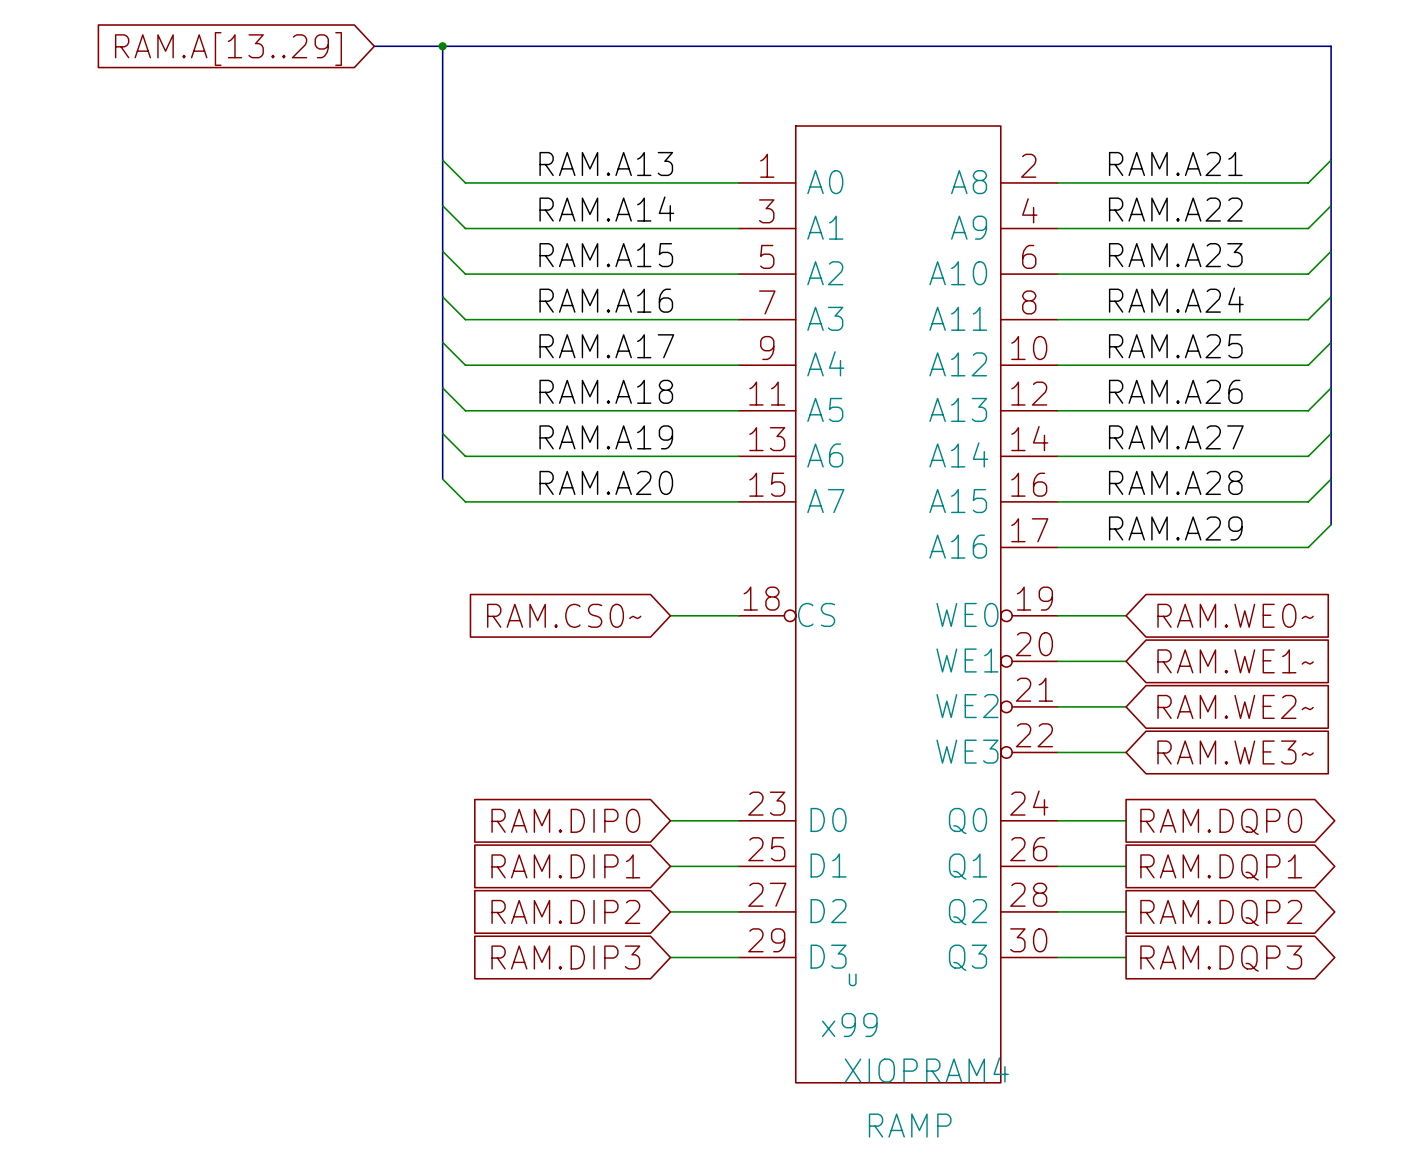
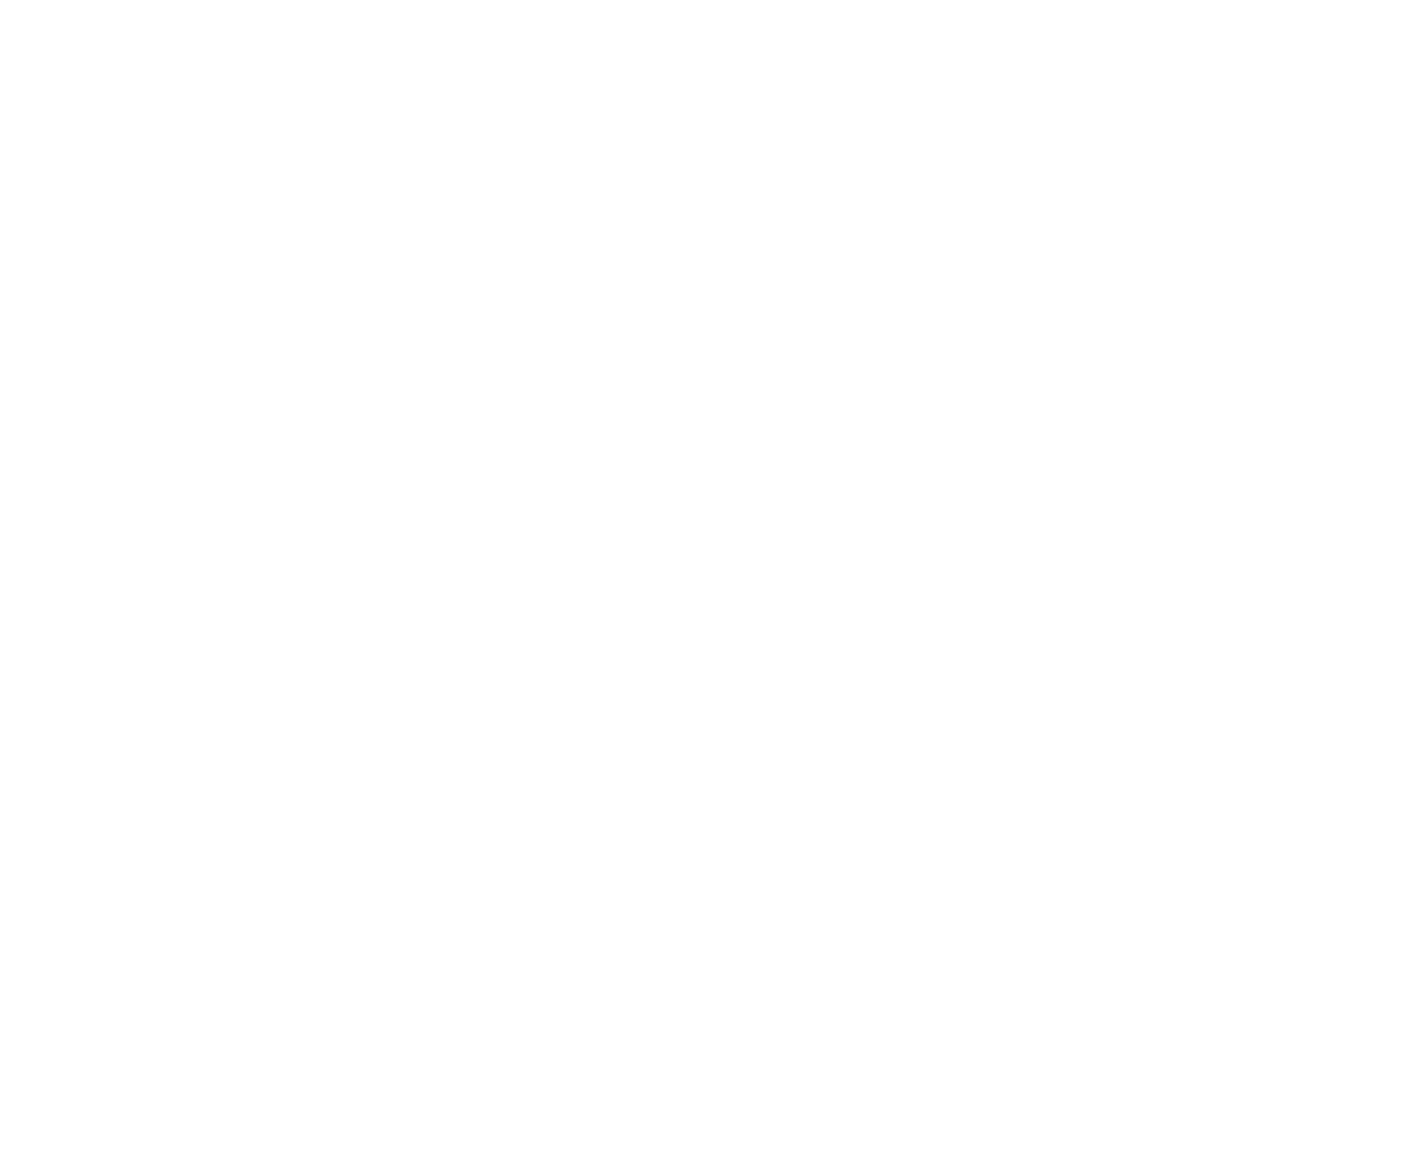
bus: (374, 46) (1331, 46) (1331, 524) -> none
bus: (442, 46) (442, 479) -> none
junction: (442, 46) -> none
global label: RAM.A[13..29] (228, 48) -> none
wire: (442, 160) (465, 182) (738, 182) -> none
wire: (1331, 160) (1308, 182) (1057, 182) -> none
label: RAM.A13 (606, 164) -> none
label: RAM.A21 (1175, 164) -> none
wire: (442, 205) (465, 228) (738, 228) -> none
wire: (1331, 205) (1308, 228) (1057, 228) -> none
label: RAM.A14 (606, 209) -> none
label: RAM.A22 (1175, 209) -> none
wire: (442, 251) (465, 274) (738, 274) -> none
wire: (1331, 251) (1308, 274) (1057, 274) -> none
label: RAM.A15 (606, 255) -> none
label: RAM.A23 (1175, 255) -> none
wire: (442, 296) (465, 319) (738, 319) -> none
wire: (1331, 296) (1308, 319) (1057, 319) -> none
label: RAM.A16 (606, 300) -> none
label: RAM.A24 (1176, 300) -> none
wire: (442, 342) (465, 365) (738, 365) -> none
wire: (1331, 342) (1308, 365) (1057, 365) -> none
label: RAM.A17 (606, 346) -> none
label: RAM.A25 (1175, 346) -> none
wire: (442, 387) (465, 410) (738, 410) -> none
wire: (1331, 387) (1308, 410) (1057, 410) -> none
label: RAM.A18 (606, 391) -> none
label: RAM.A26 (1175, 391) -> none
wire: (442, 433) (465, 456) (738, 456) -> none
wire: (1331, 433) (1308, 456) (1057, 456) -> none
label: RAM.A19 (606, 437) -> none
label: RAM.A27 (1176, 437) -> none
wire: (442, 479) (465, 501) (738, 501) -> none
wire: (1331, 479) (1308, 501) (1057, 501) -> none
label: RAM.A20 (606, 482) -> none
label: RAM.A28 (1175, 482) -> none
wire: (1331, 524) (1308, 547) (1057, 547) -> none
label: RAM.A29 (1175, 528) -> none
U: XIOPRAM4 (898, 604) -> none
global label: RAM.CS0~ (564, 615) -> none
wire: (670, 615) (738, 615) -> none
wire: (1057, 615) (1126, 615) -> none
global label: RAM.WE0~ (1235, 615) -> none
wire: (1057, 661) (1126, 661) -> none
global label: RAM.WE1~ (1235, 661) -> none
wire: (1057, 706) (1126, 706) -> none
global label: RAM.WE2~ (1235, 706) -> none
wire: (1057, 752) (1126, 752) -> none
global label: RAM.WE3~ (1235, 752) -> none
global label: RAM.DIP0 (565, 820) -> none
wire: (670, 820) (738, 820) -> none
wire: (1057, 820) (1126, 820) -> none
global label: RAM.DQP0 (1221, 821) -> none
global label: RAM.DIP1 (565, 866) -> none
wire: (670, 866) (738, 866) -> none
wire: (1057, 866) (1126, 866) -> none
global label: RAM.DQP1 (1221, 867) -> none
global label: RAM.DIP2 (565, 911) -> none
wire: (670, 911) (738, 911) -> none
wire: (1057, 911) (1126, 911) -> none
global label: RAM.DQP2 (1221, 913) -> none
global label: RAM.DIP3 (565, 957) -> none
wire: (670, 957) (738, 957) -> none
wire: (1057, 957) (1126, 957) -> none
global label: RAM.DQP3 (1221, 958) -> none

